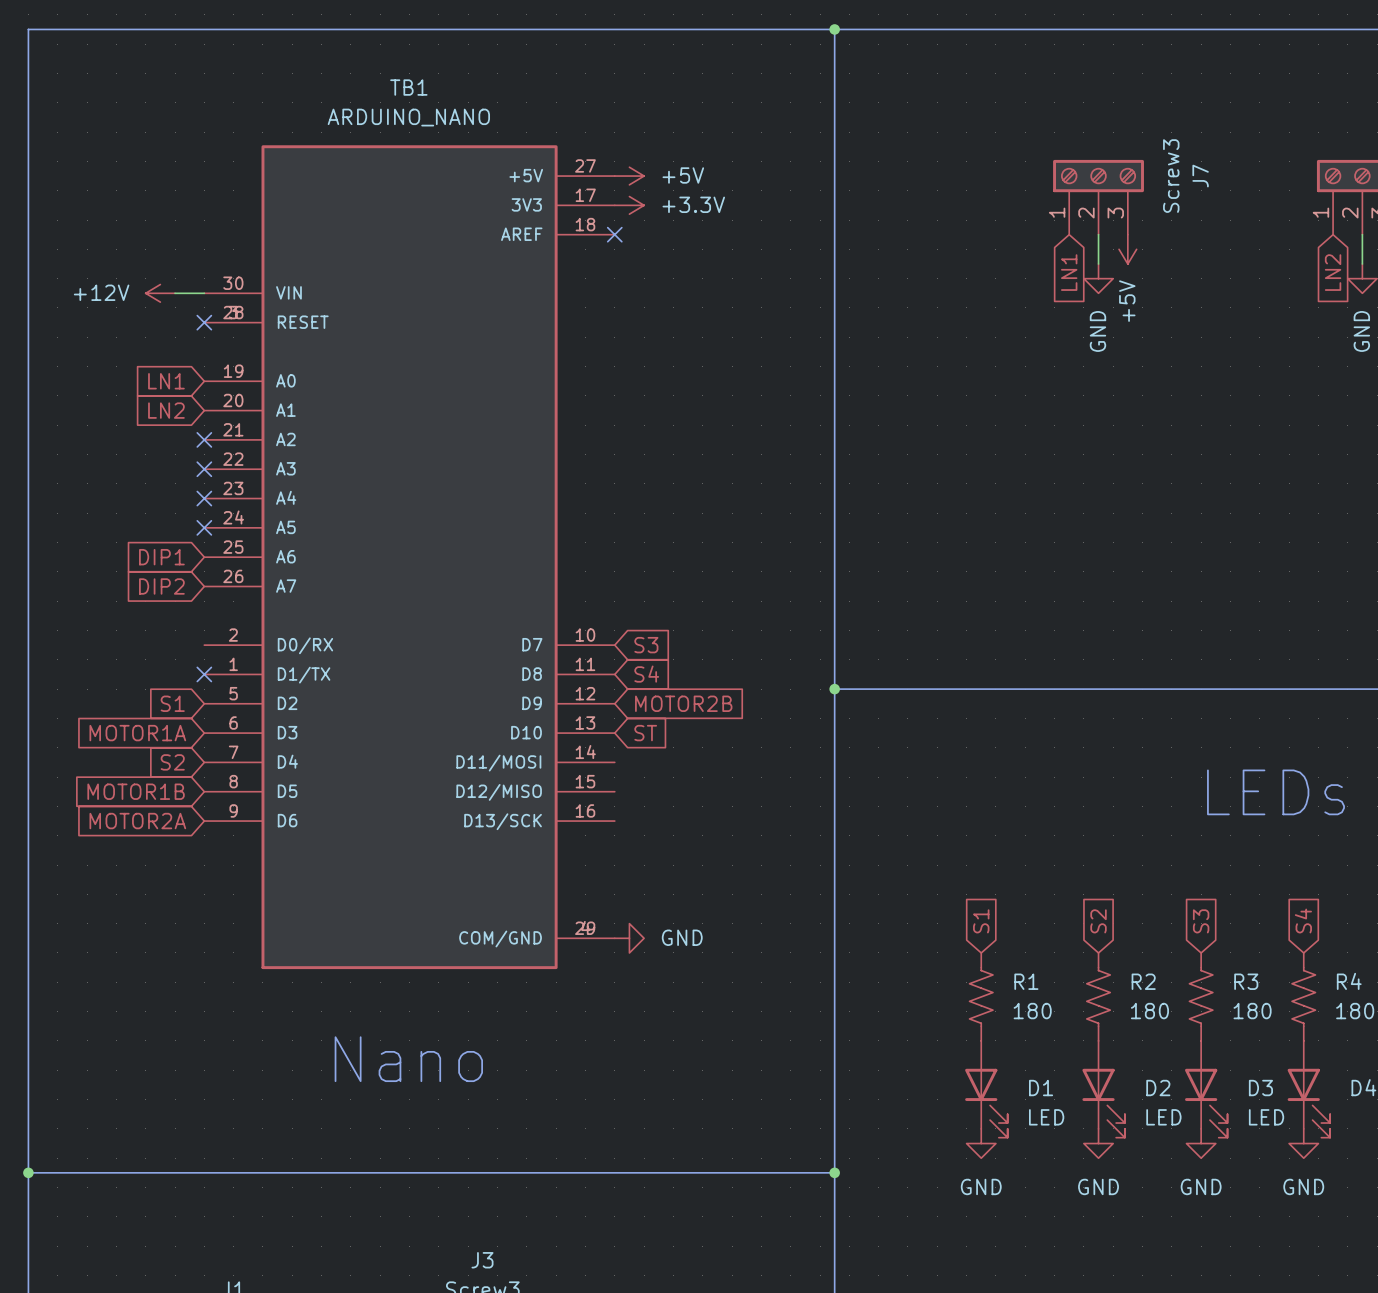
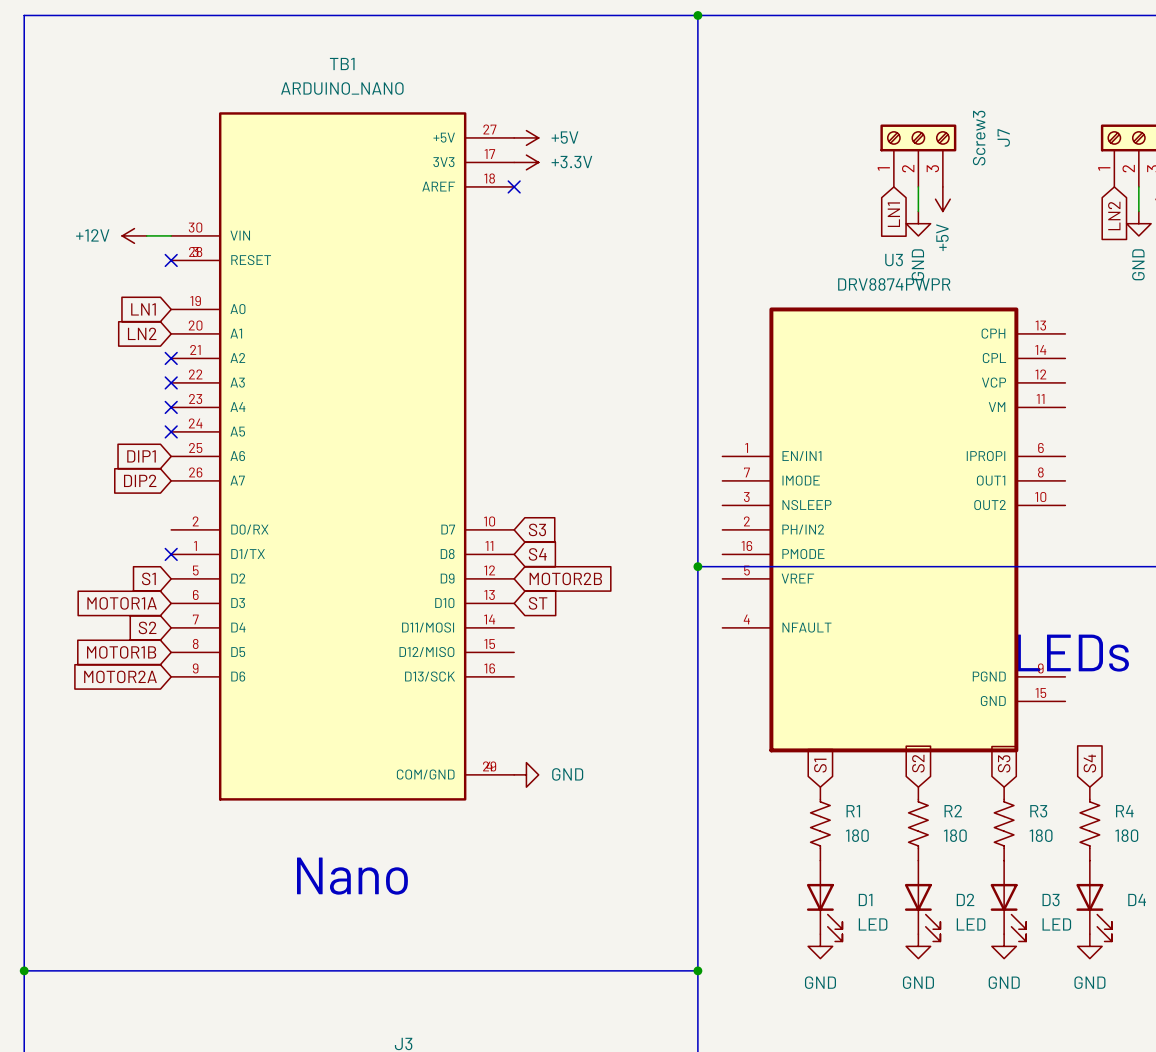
U3: none -> DRV8874PWPR (893, 529)

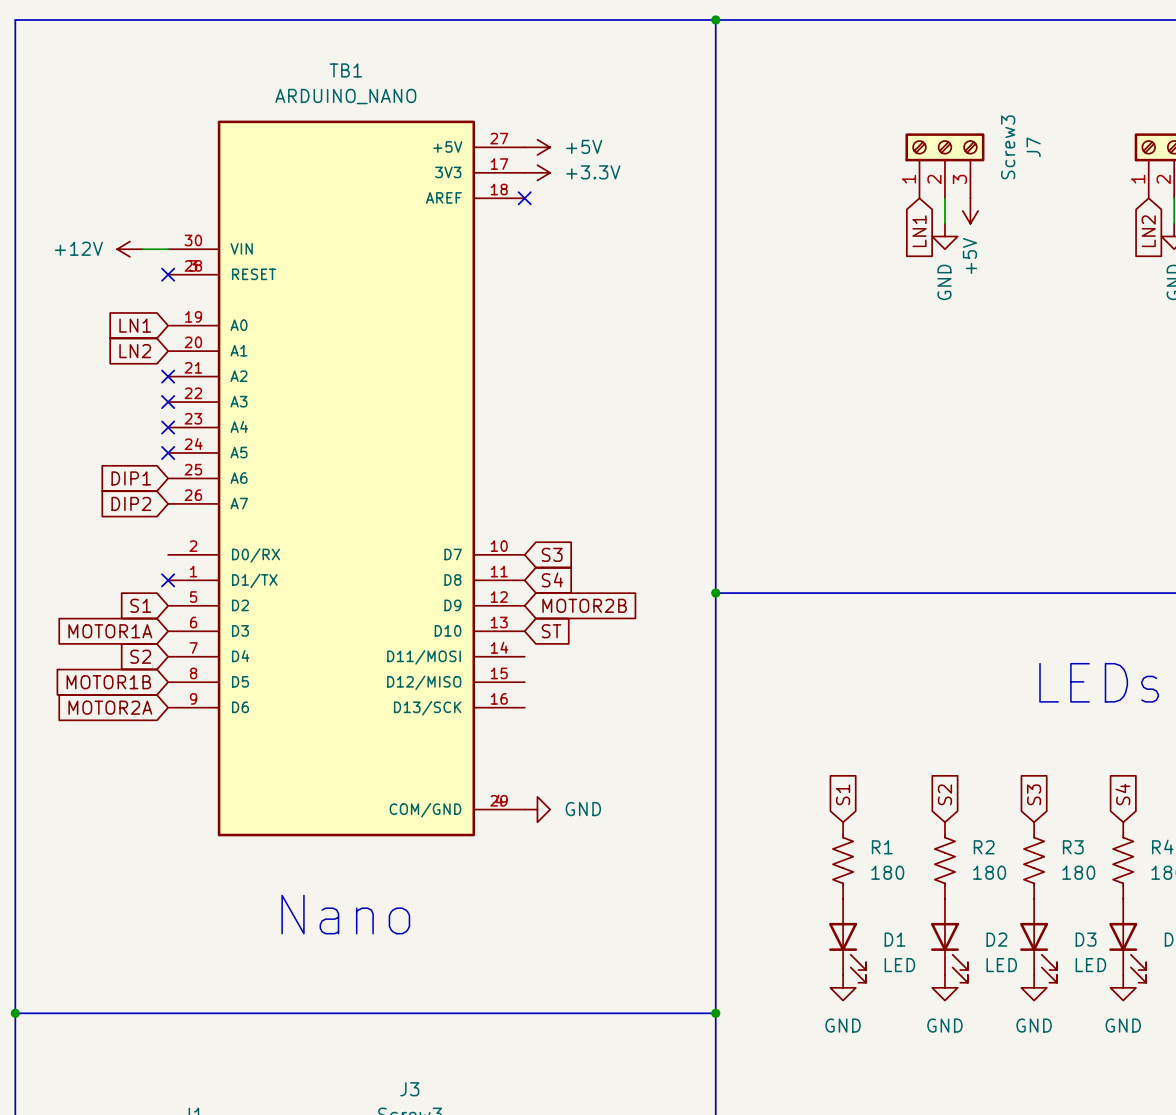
U3: DRV8874PWPR (893, 529) -> none

